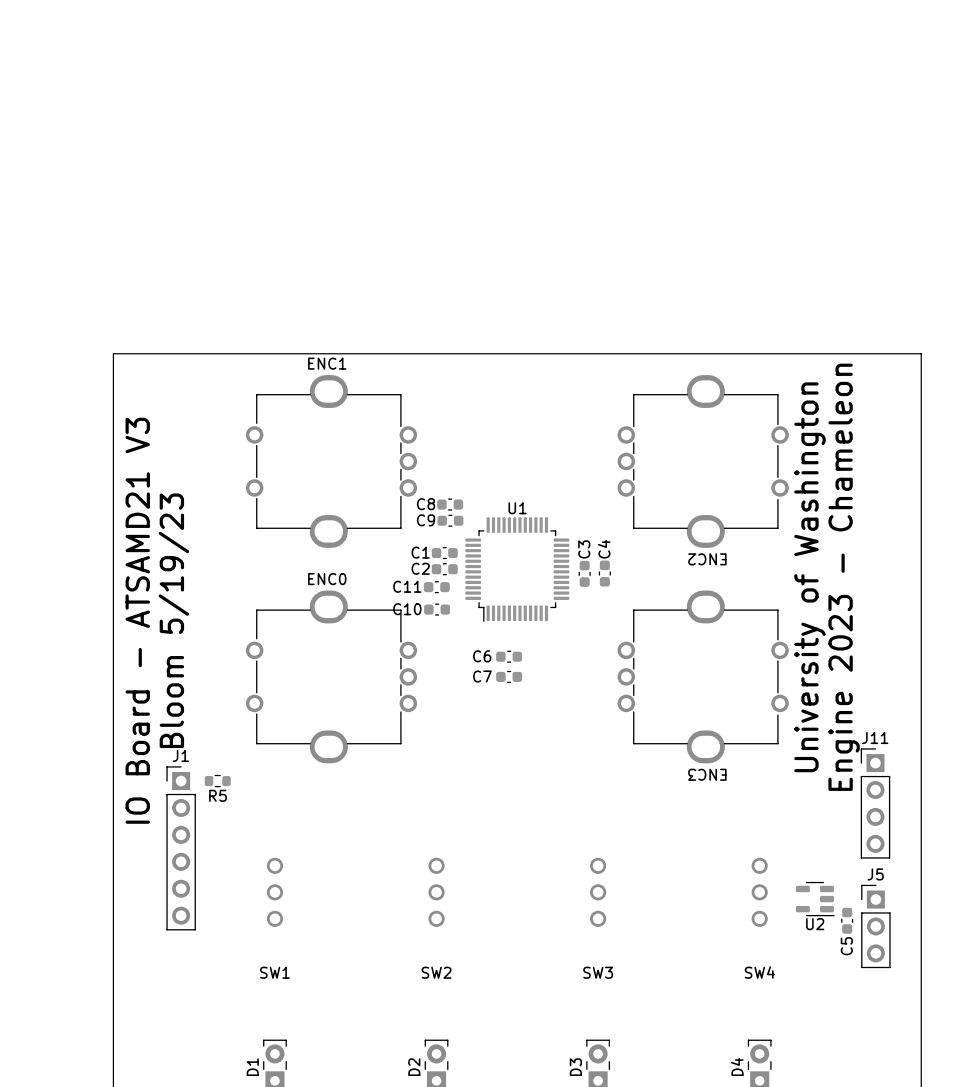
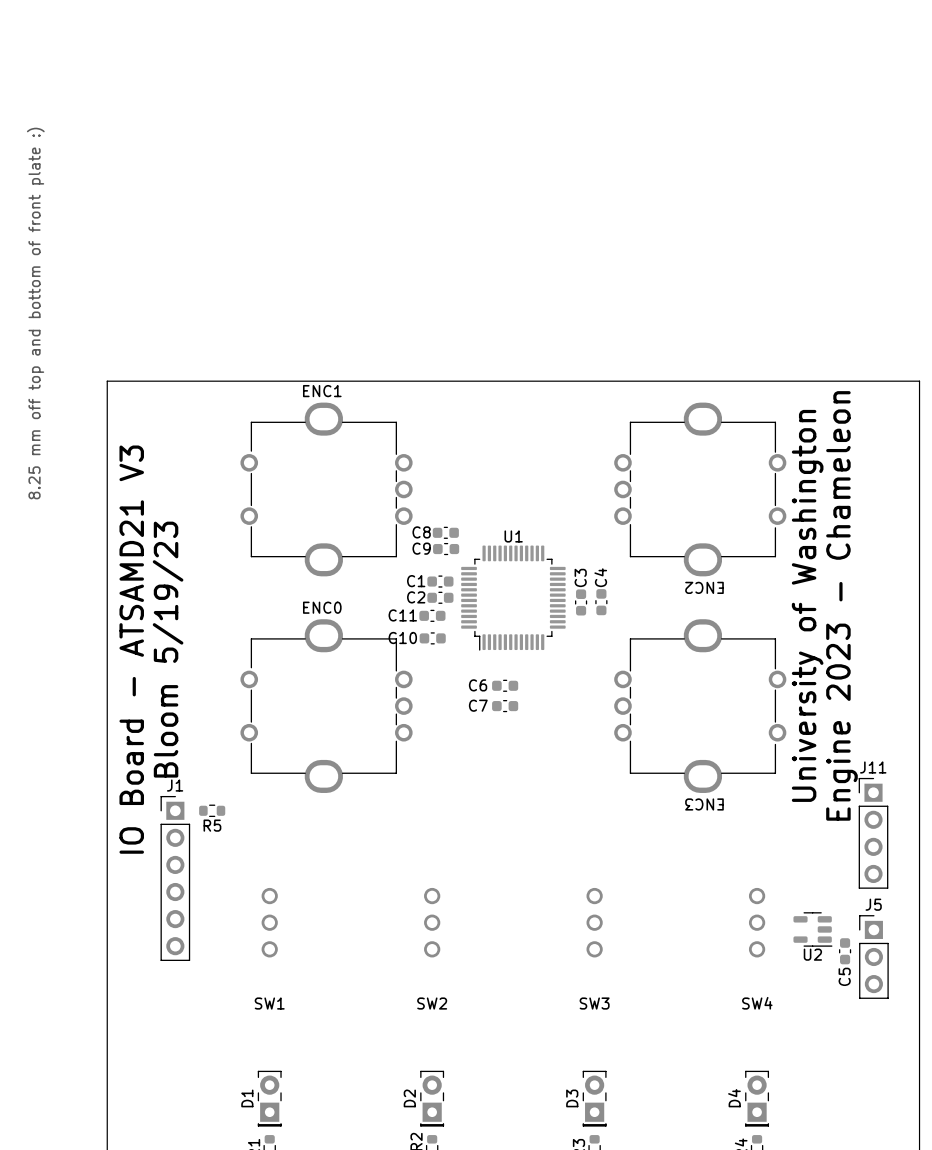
text: none -> 8.25 mm off top and bottom of front plate :) (35, 313)

